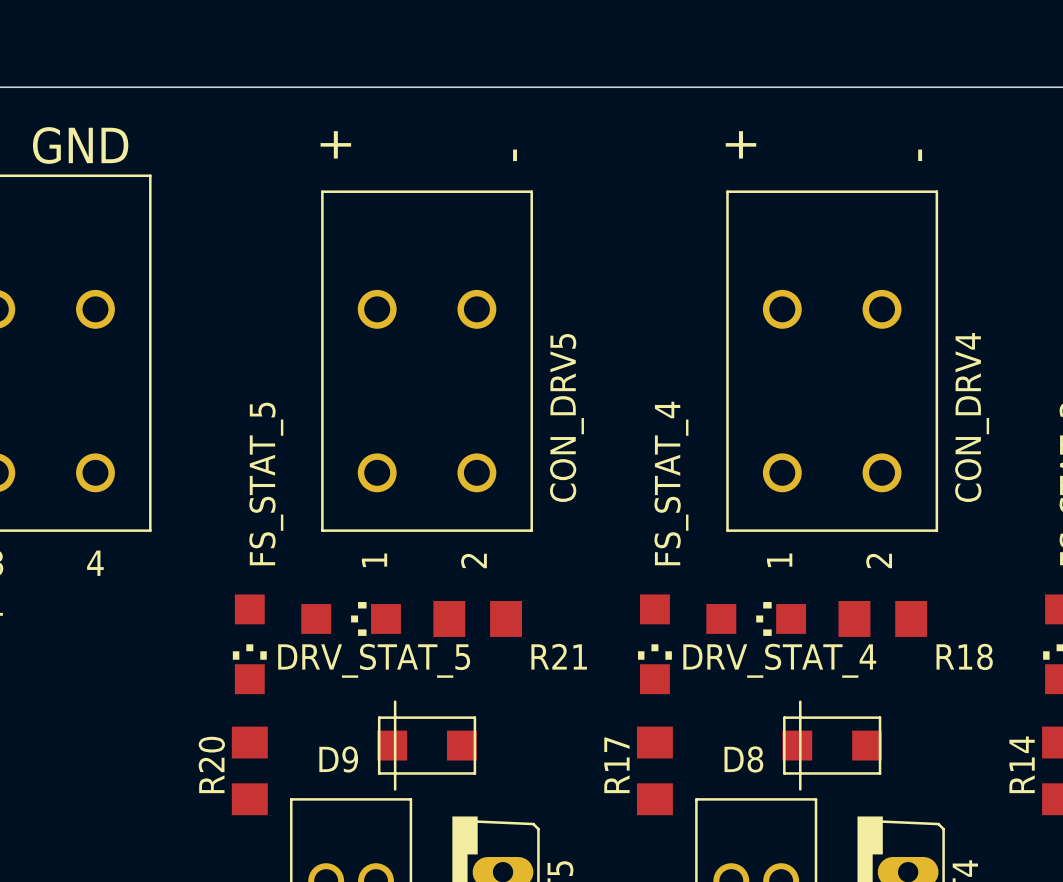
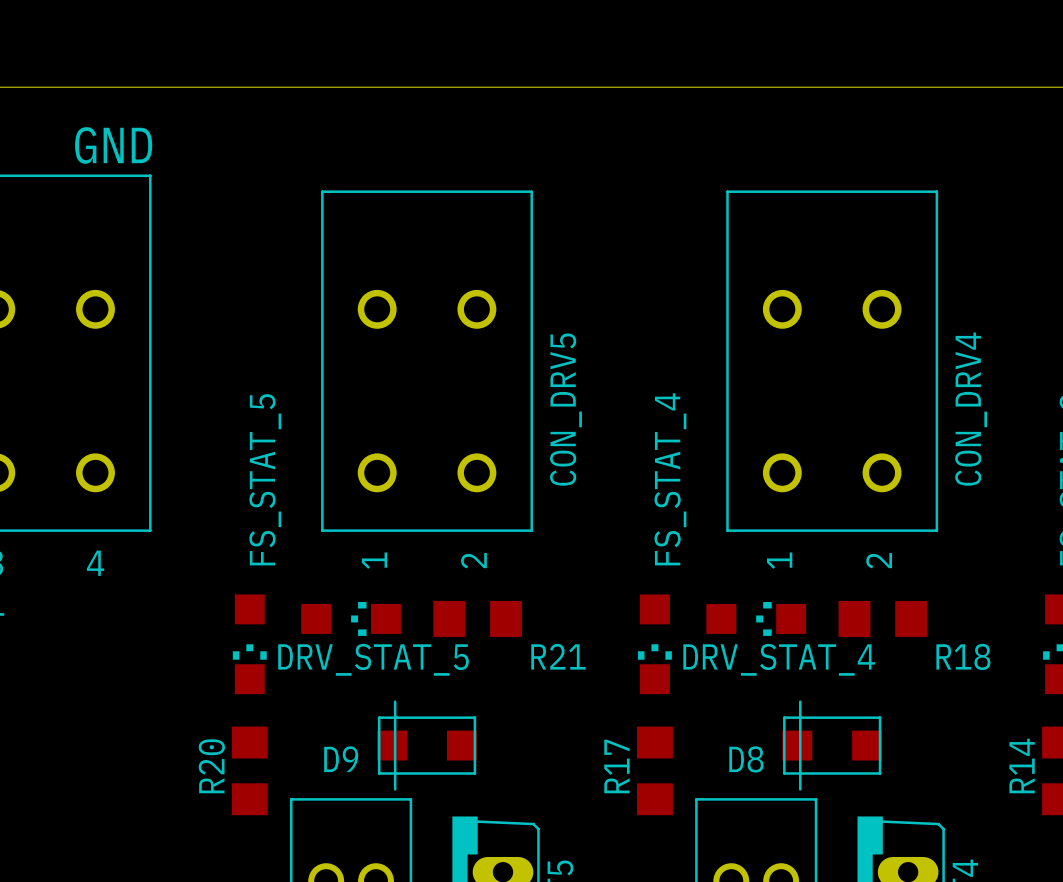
text: + (335, 144) -> none
text: + (740, 144) -> none
text: - (515, 155) -> none
text: - (920, 155) -> none

